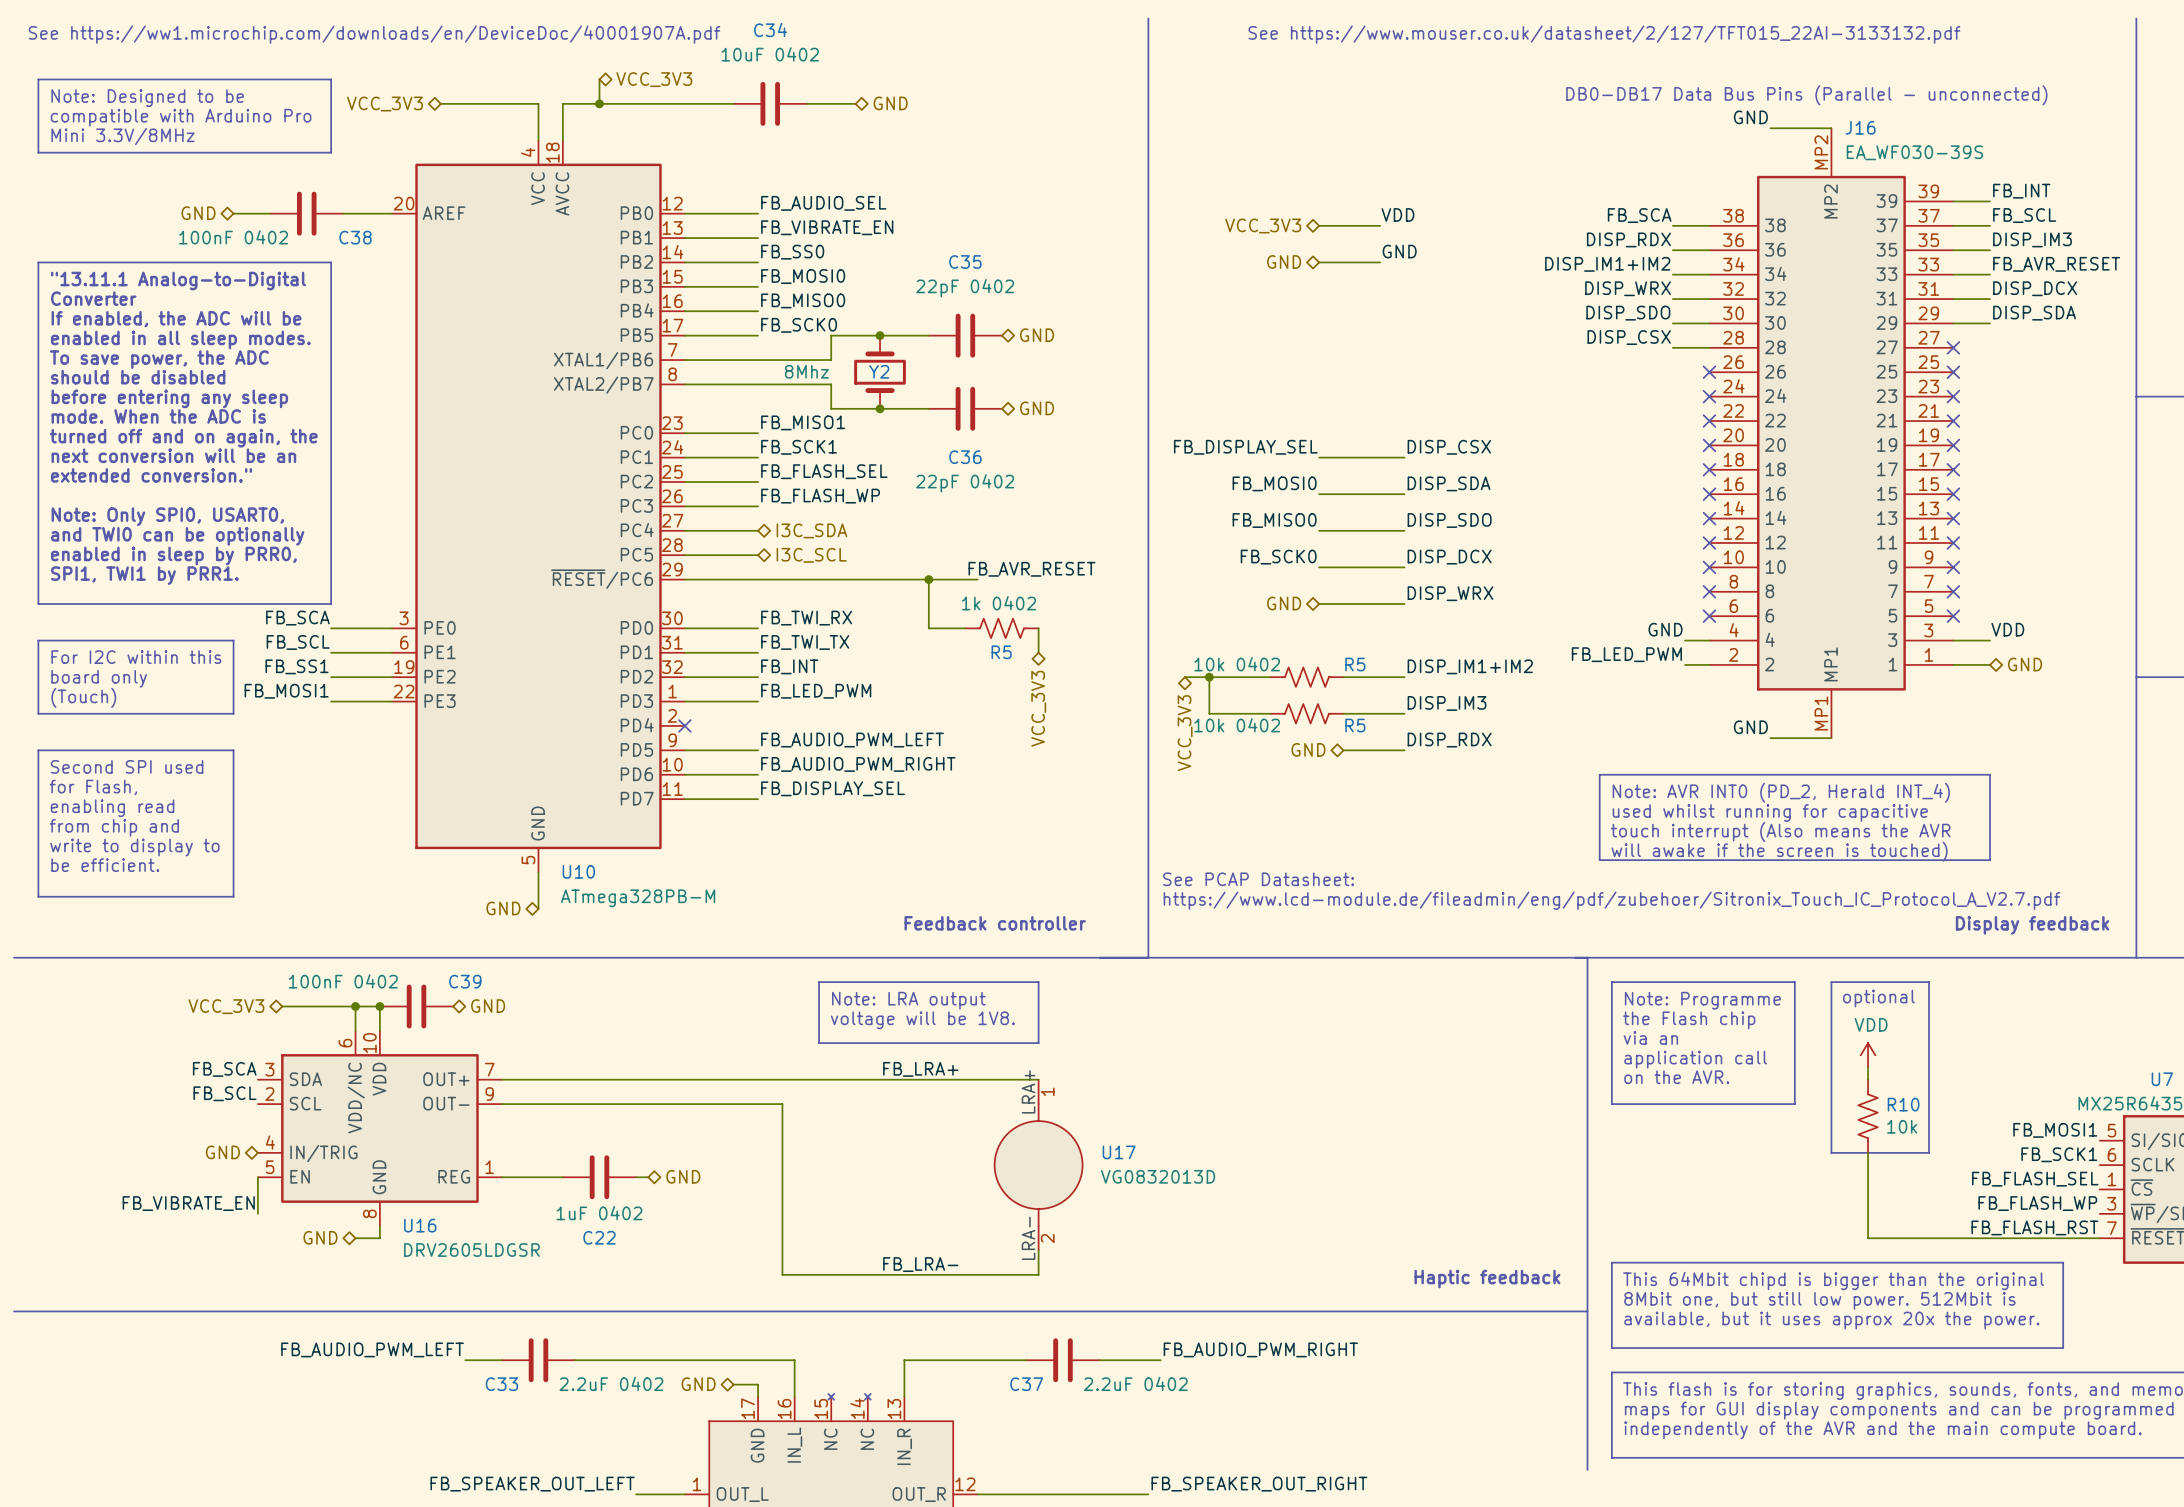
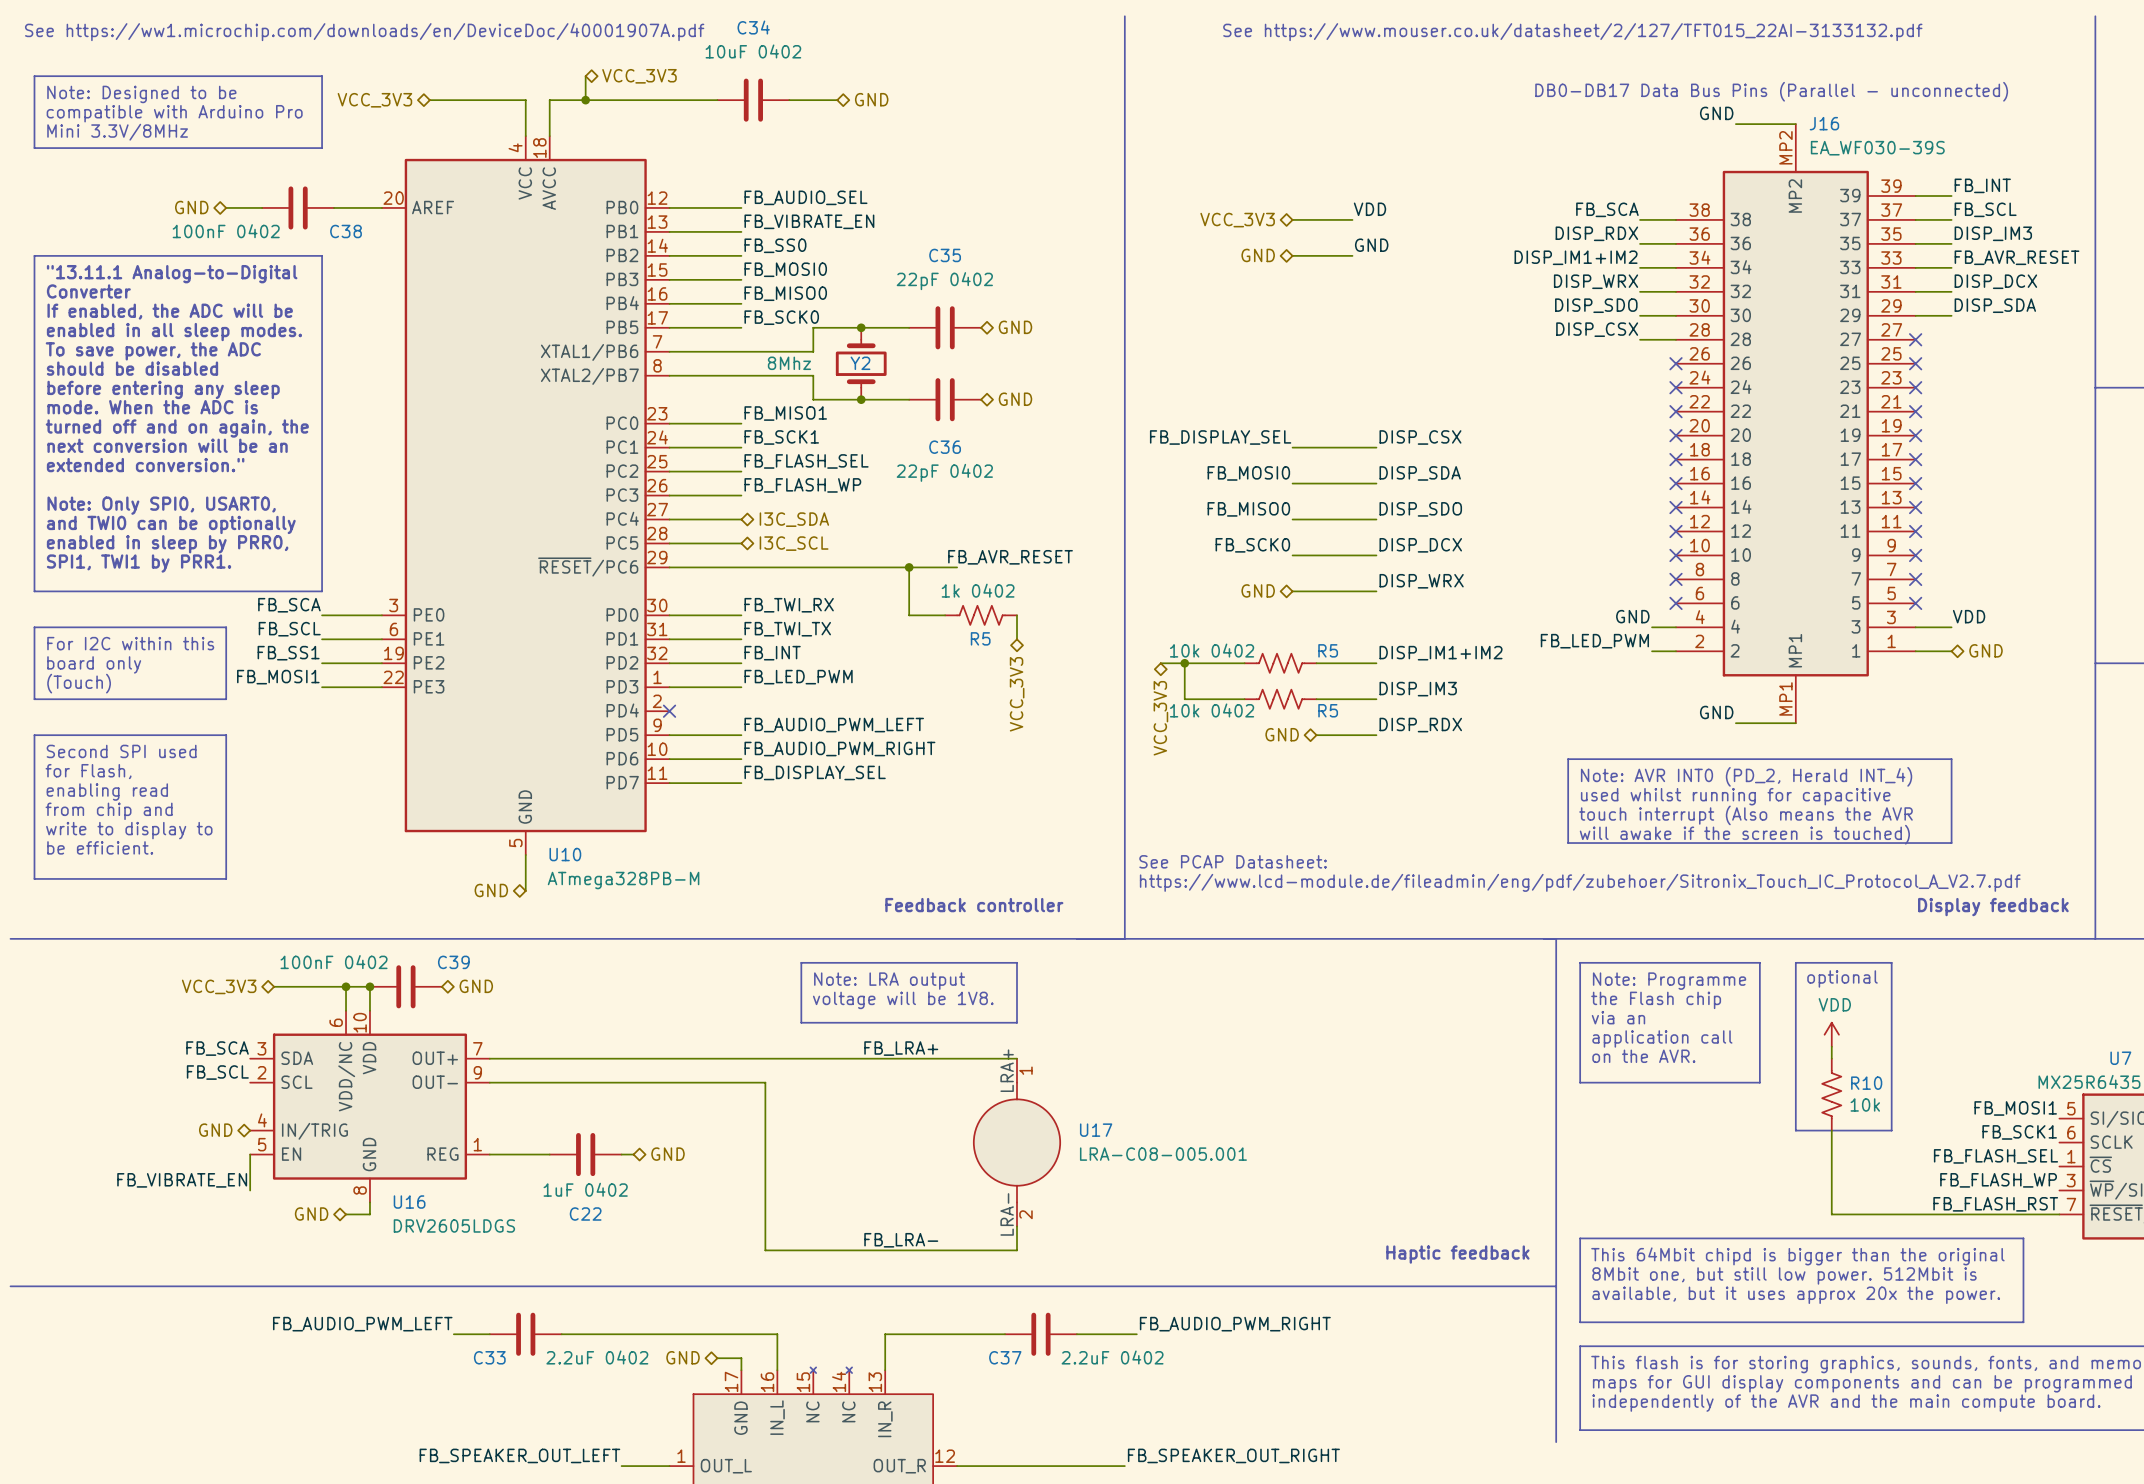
U17 value: VG0832013D (1158, 1176) -> LRA-C08-005.001 (1163, 1154)
U16 value: DRV2605LDGSR (471, 1250) -> DRV2605LDGS (454, 1225)

